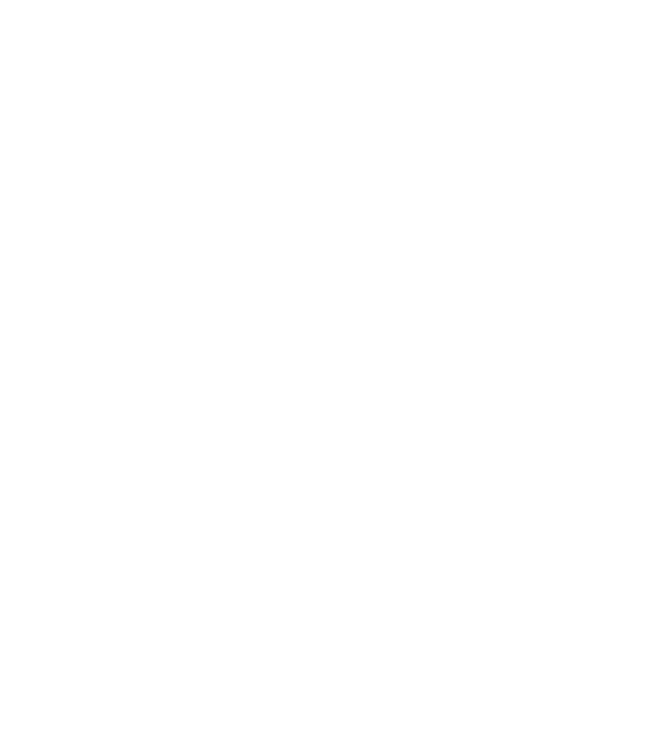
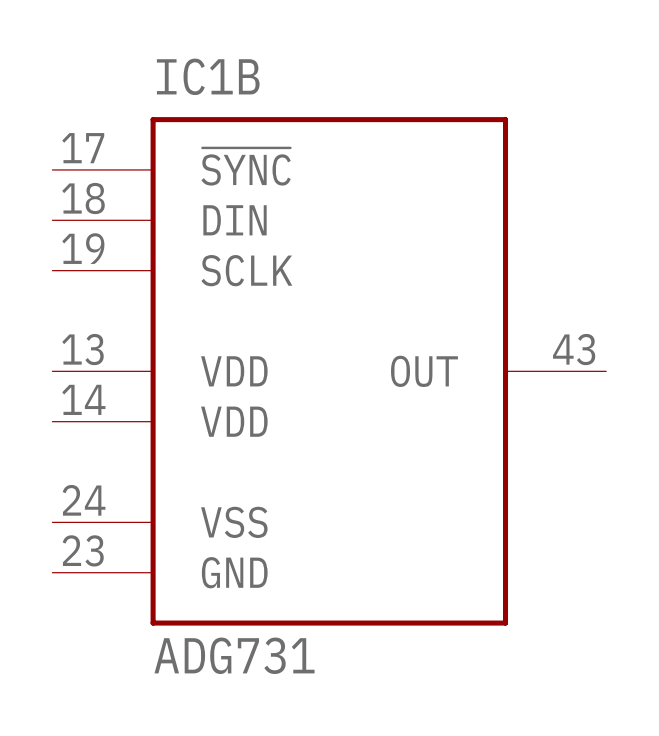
IC1B: none -> ADG731 (329, 371)

